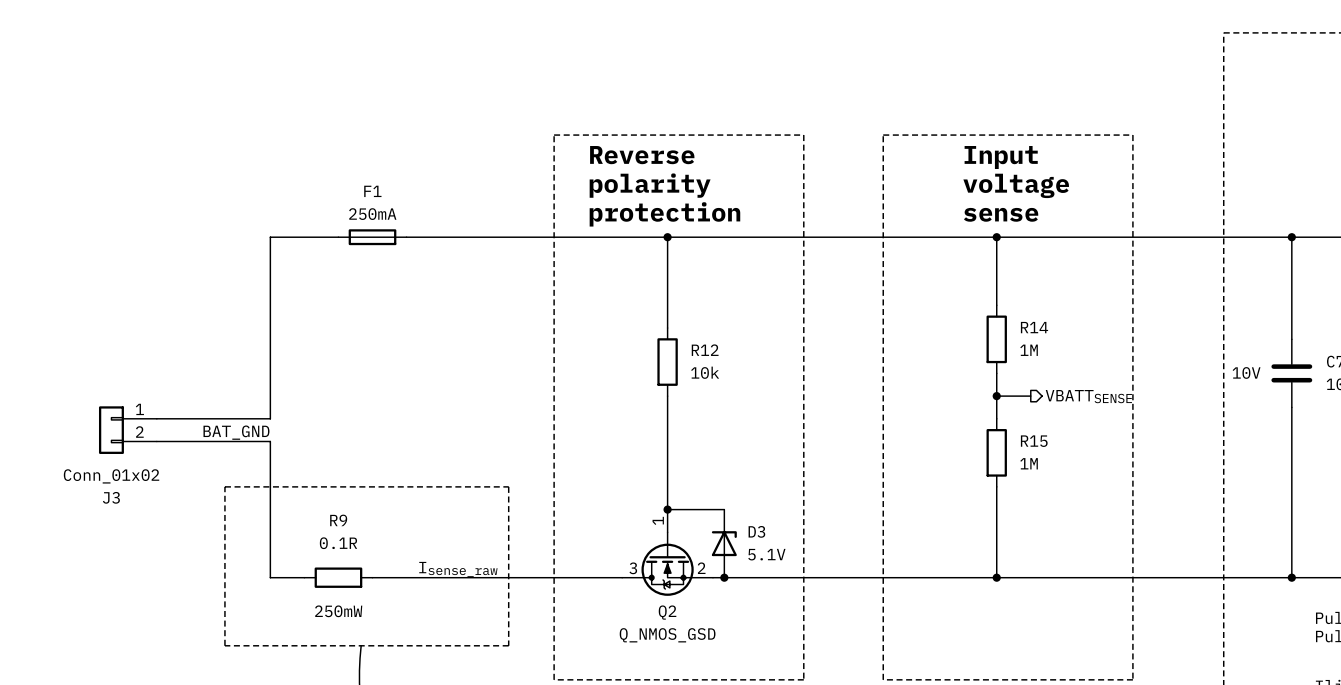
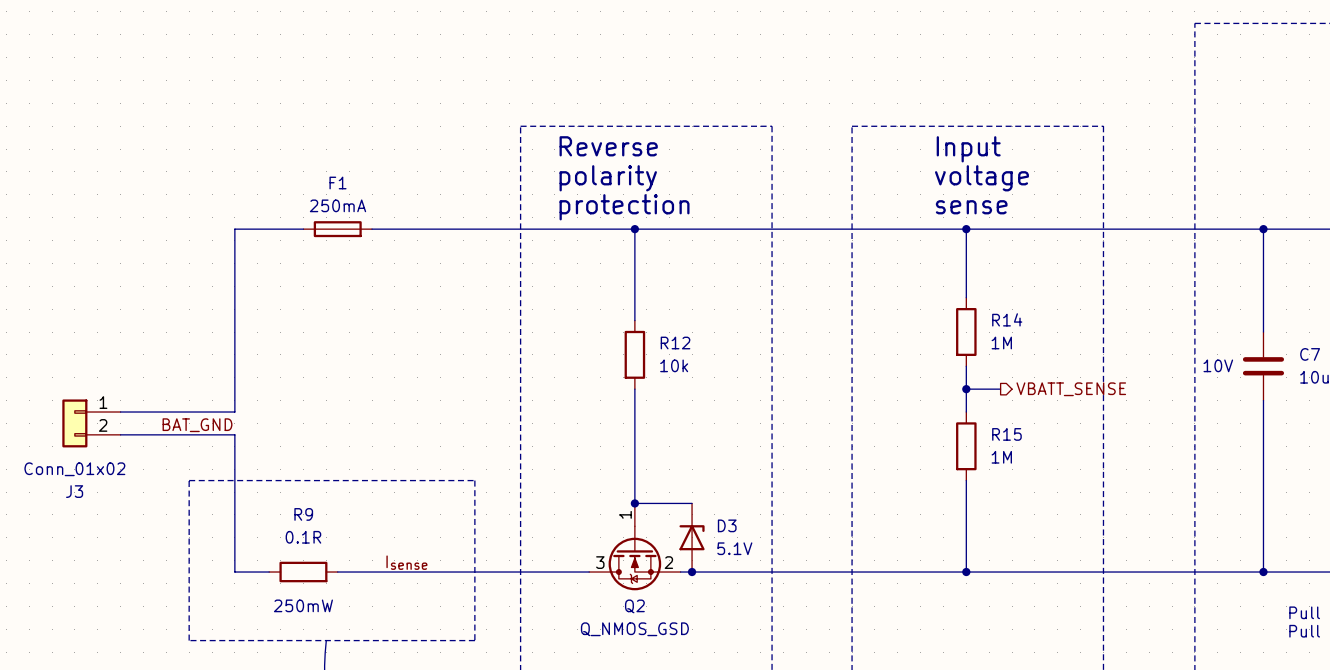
hierarchical label: VBATTSENSE (1088, 396) -> VBATT_SENSE (1071, 389)
label: Isense_raw (458, 569) -> Isense (406, 562)

